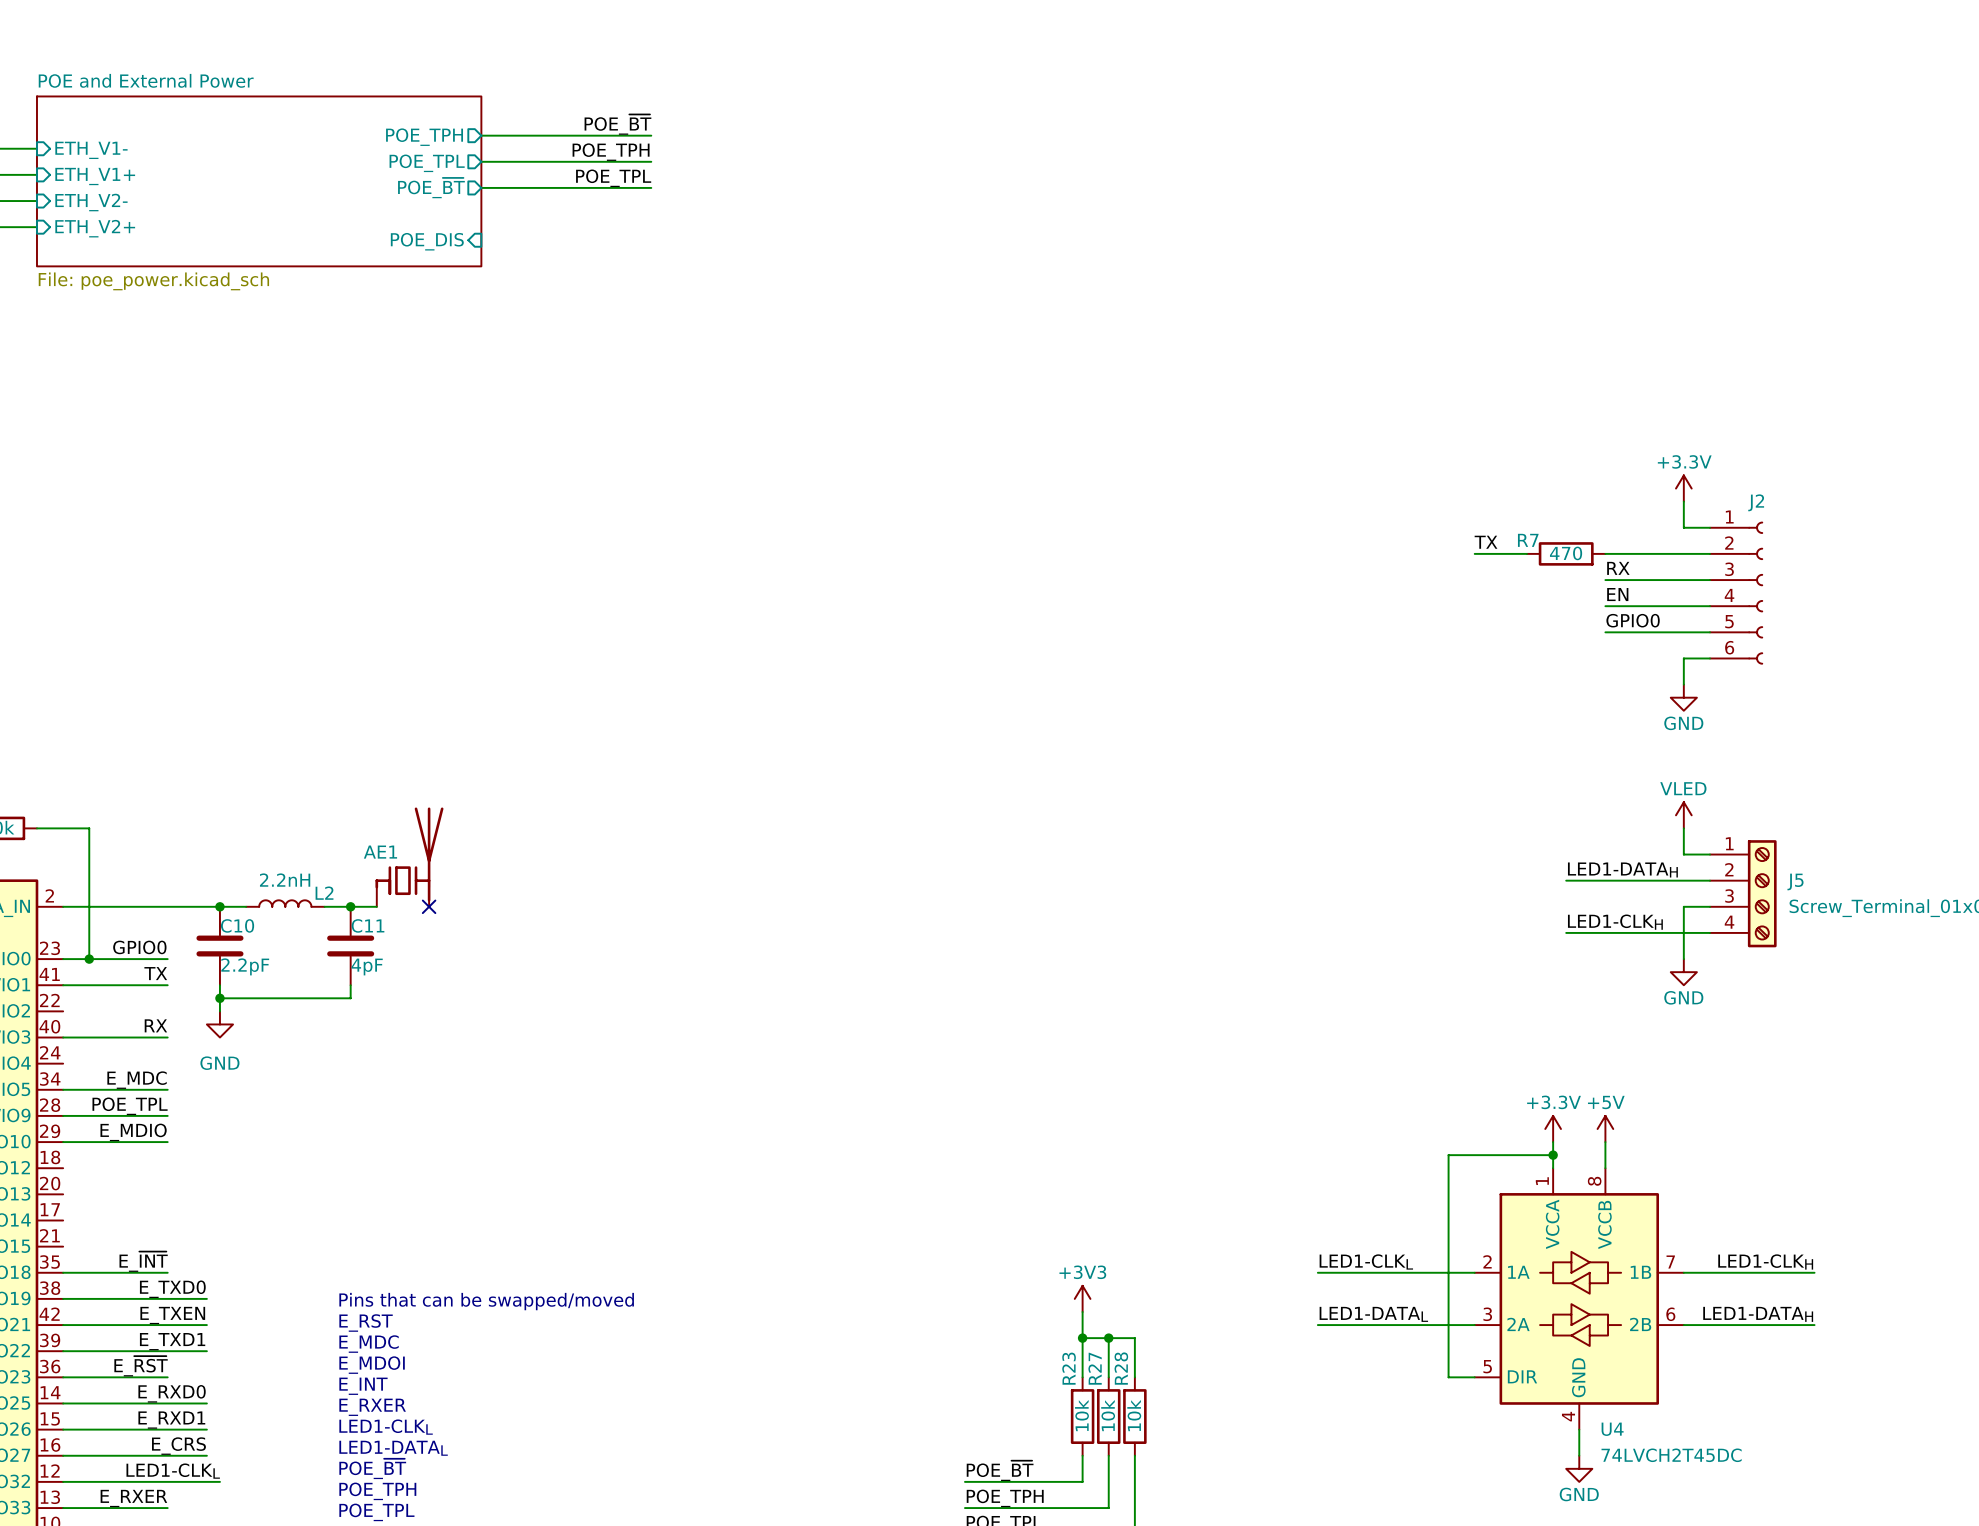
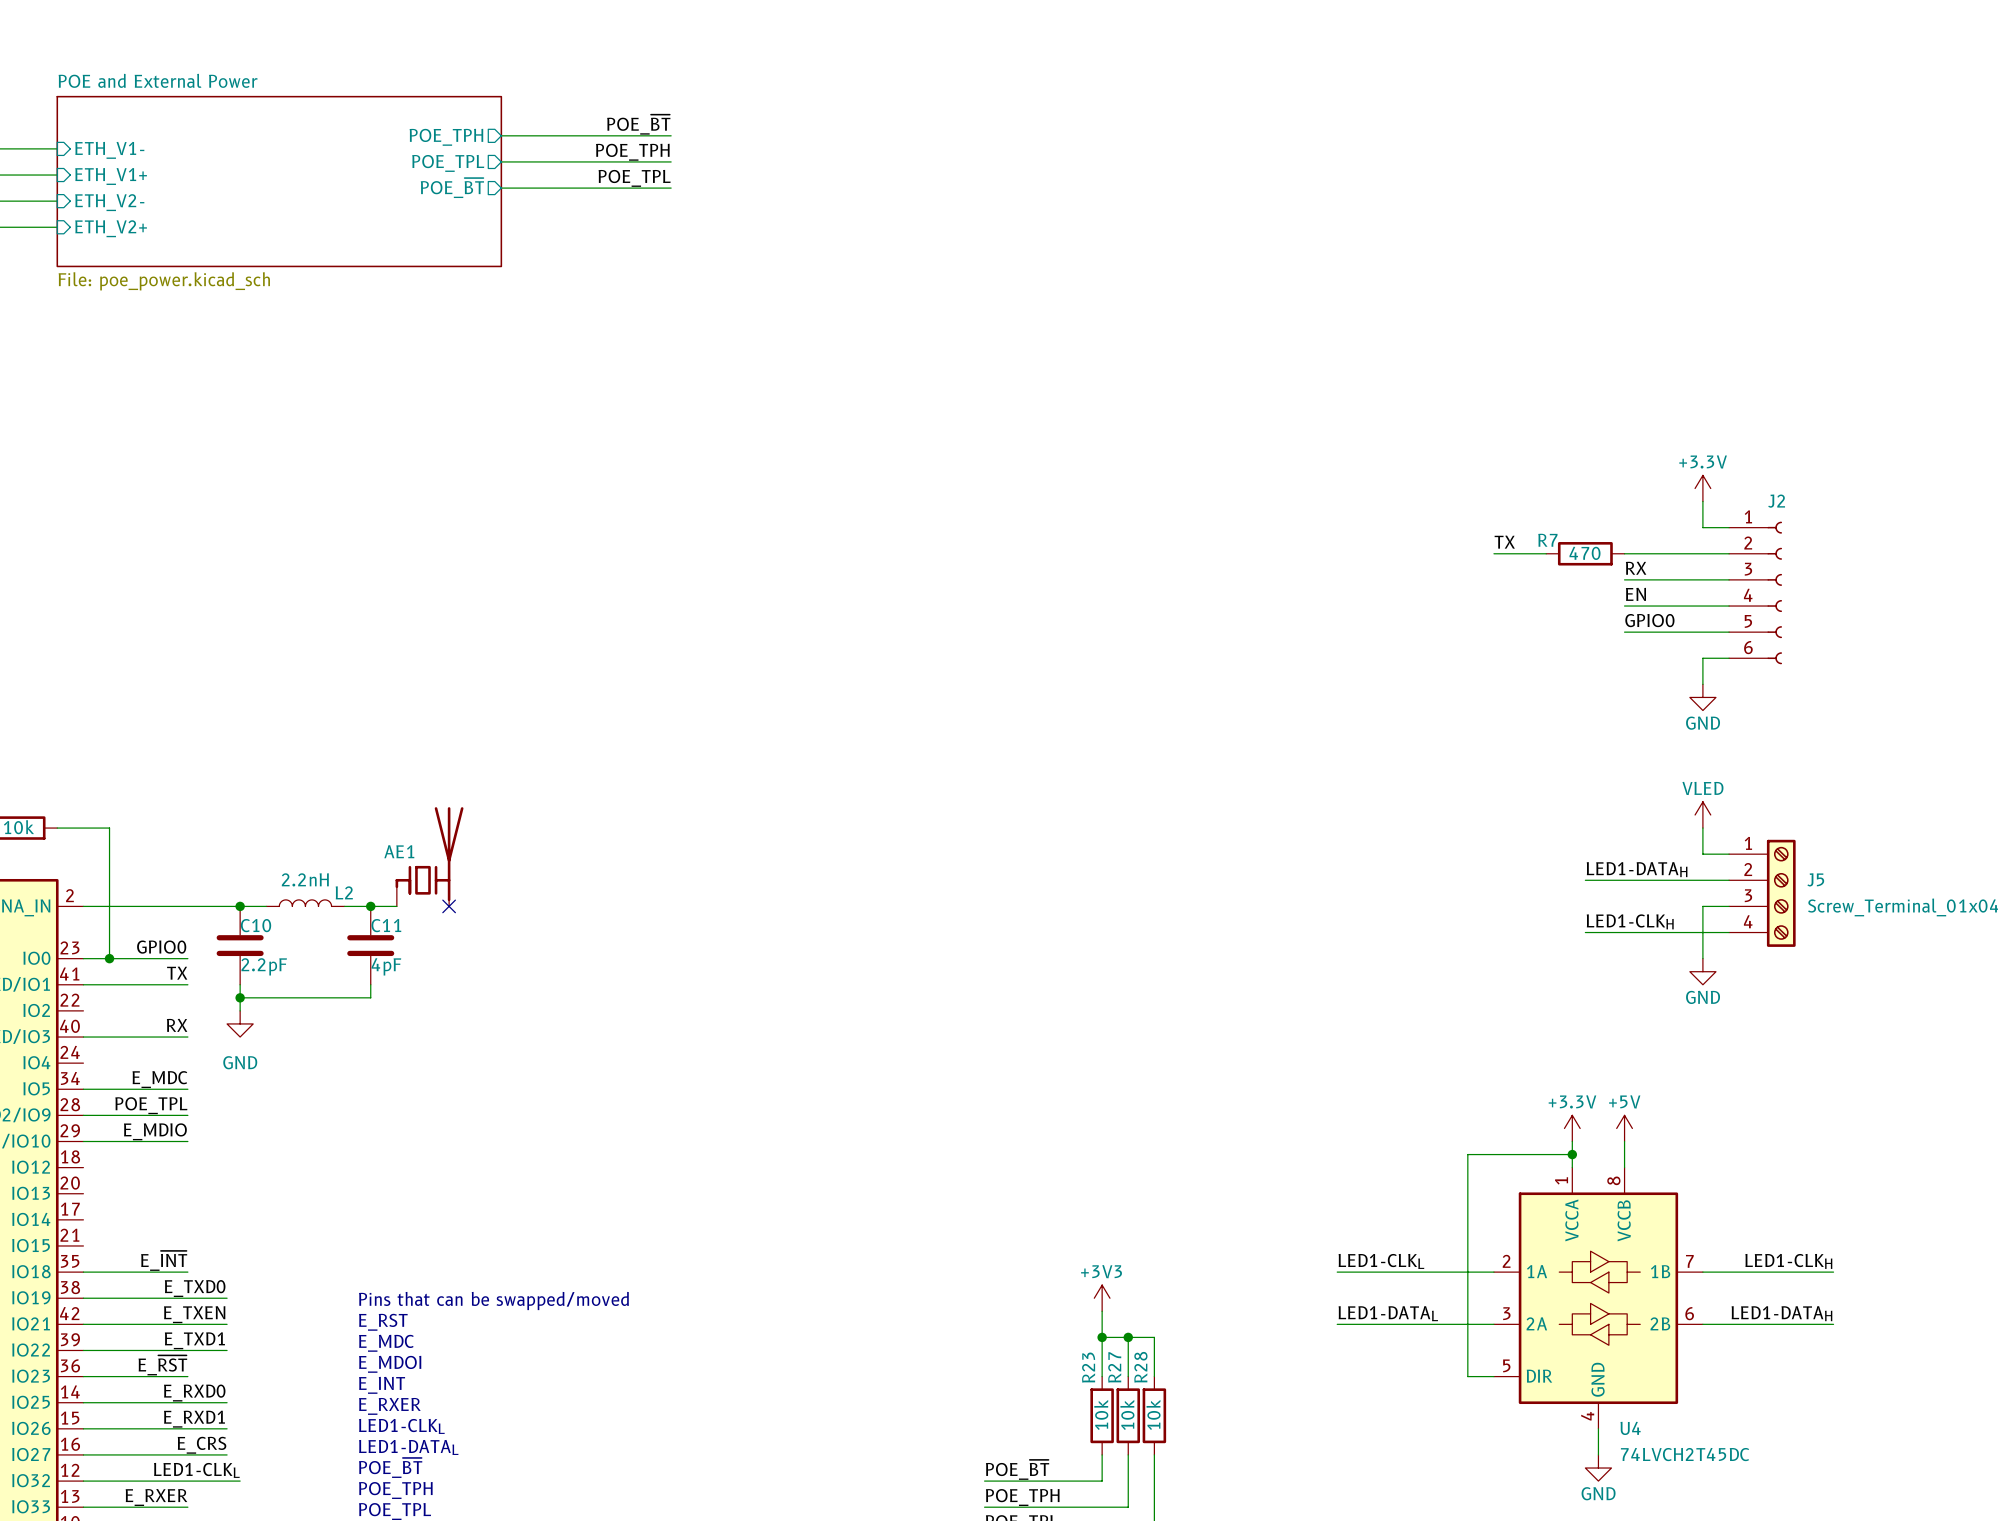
sheet pin: POE_DIS (427, 241) -> none

